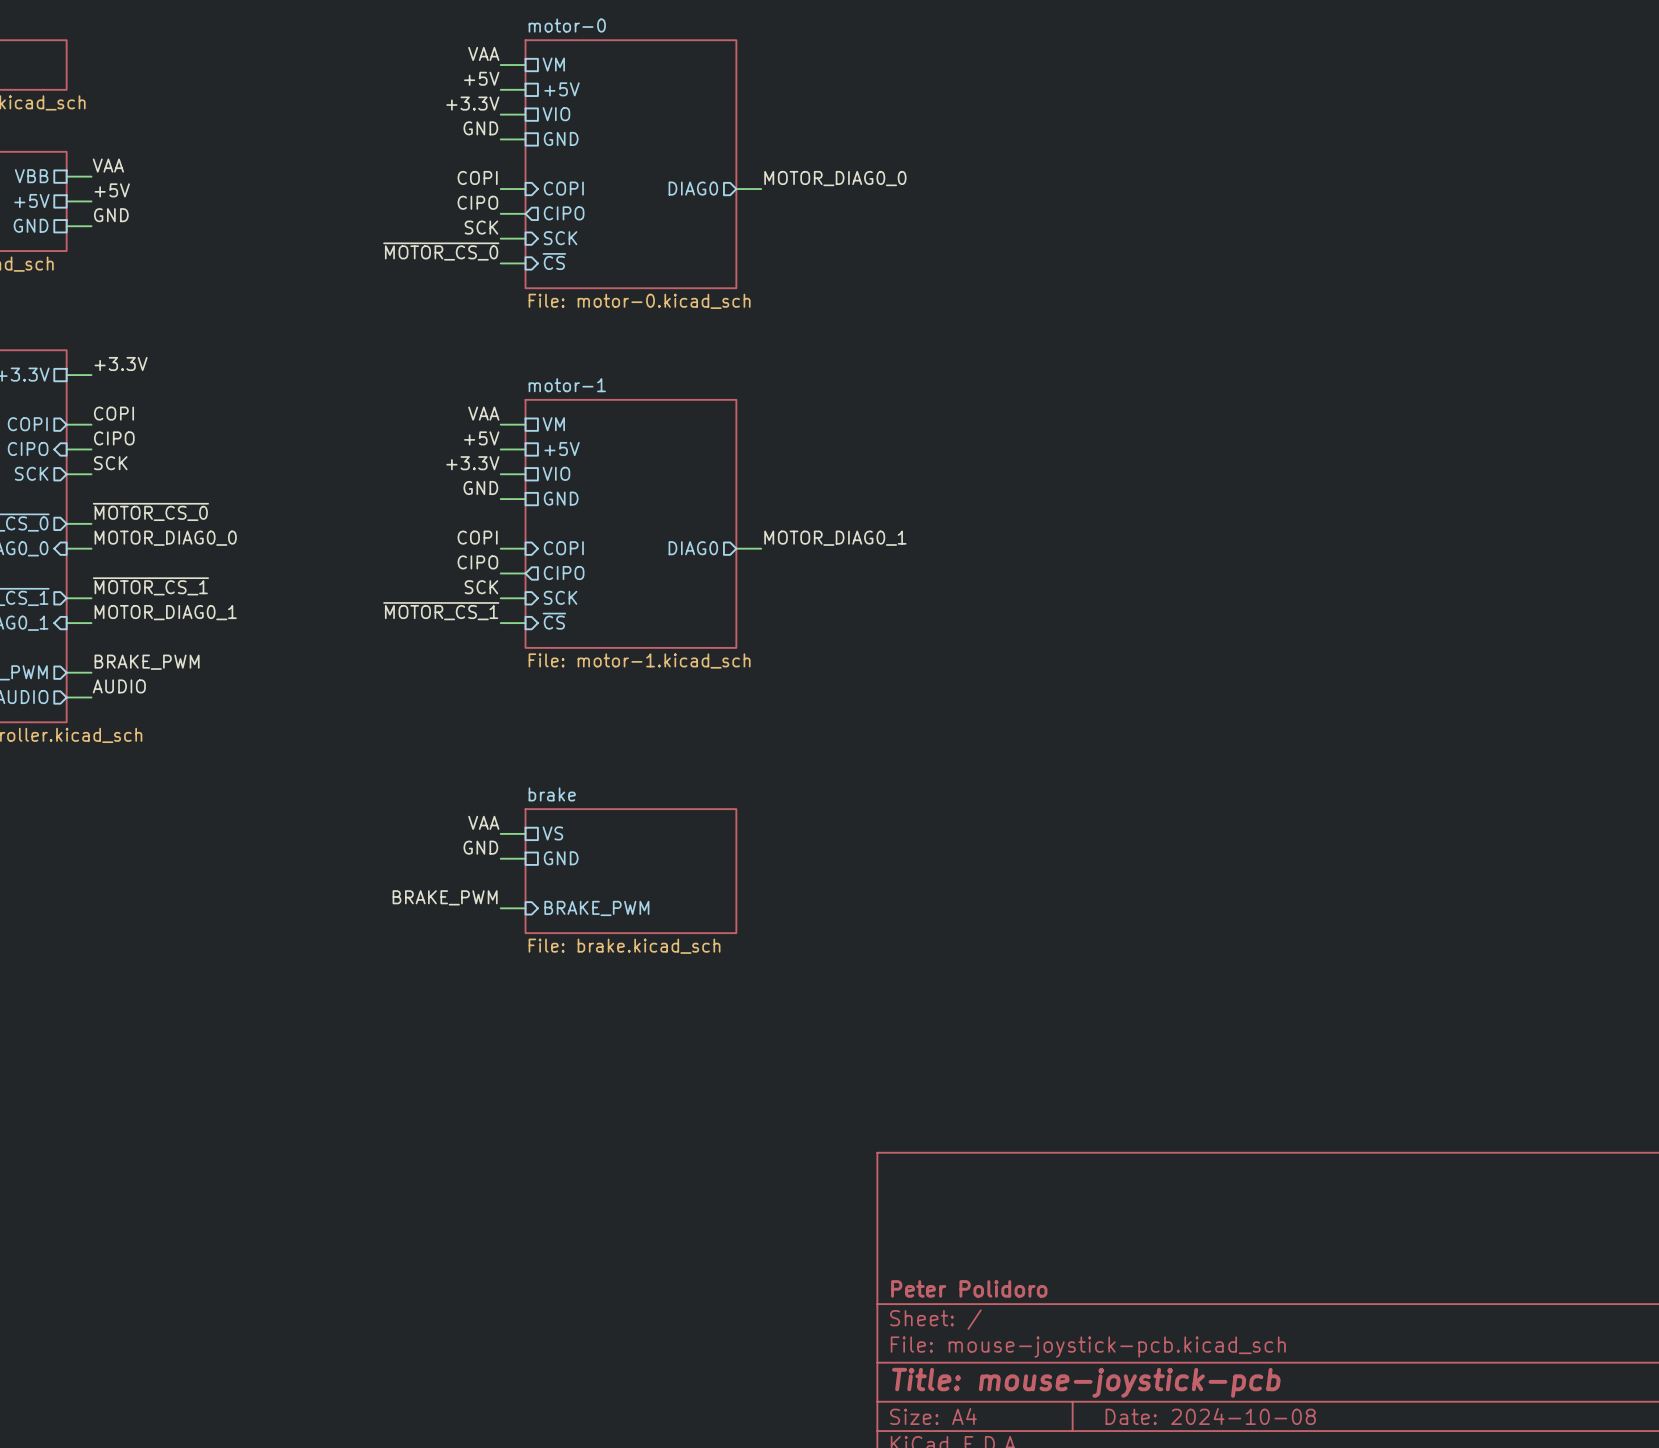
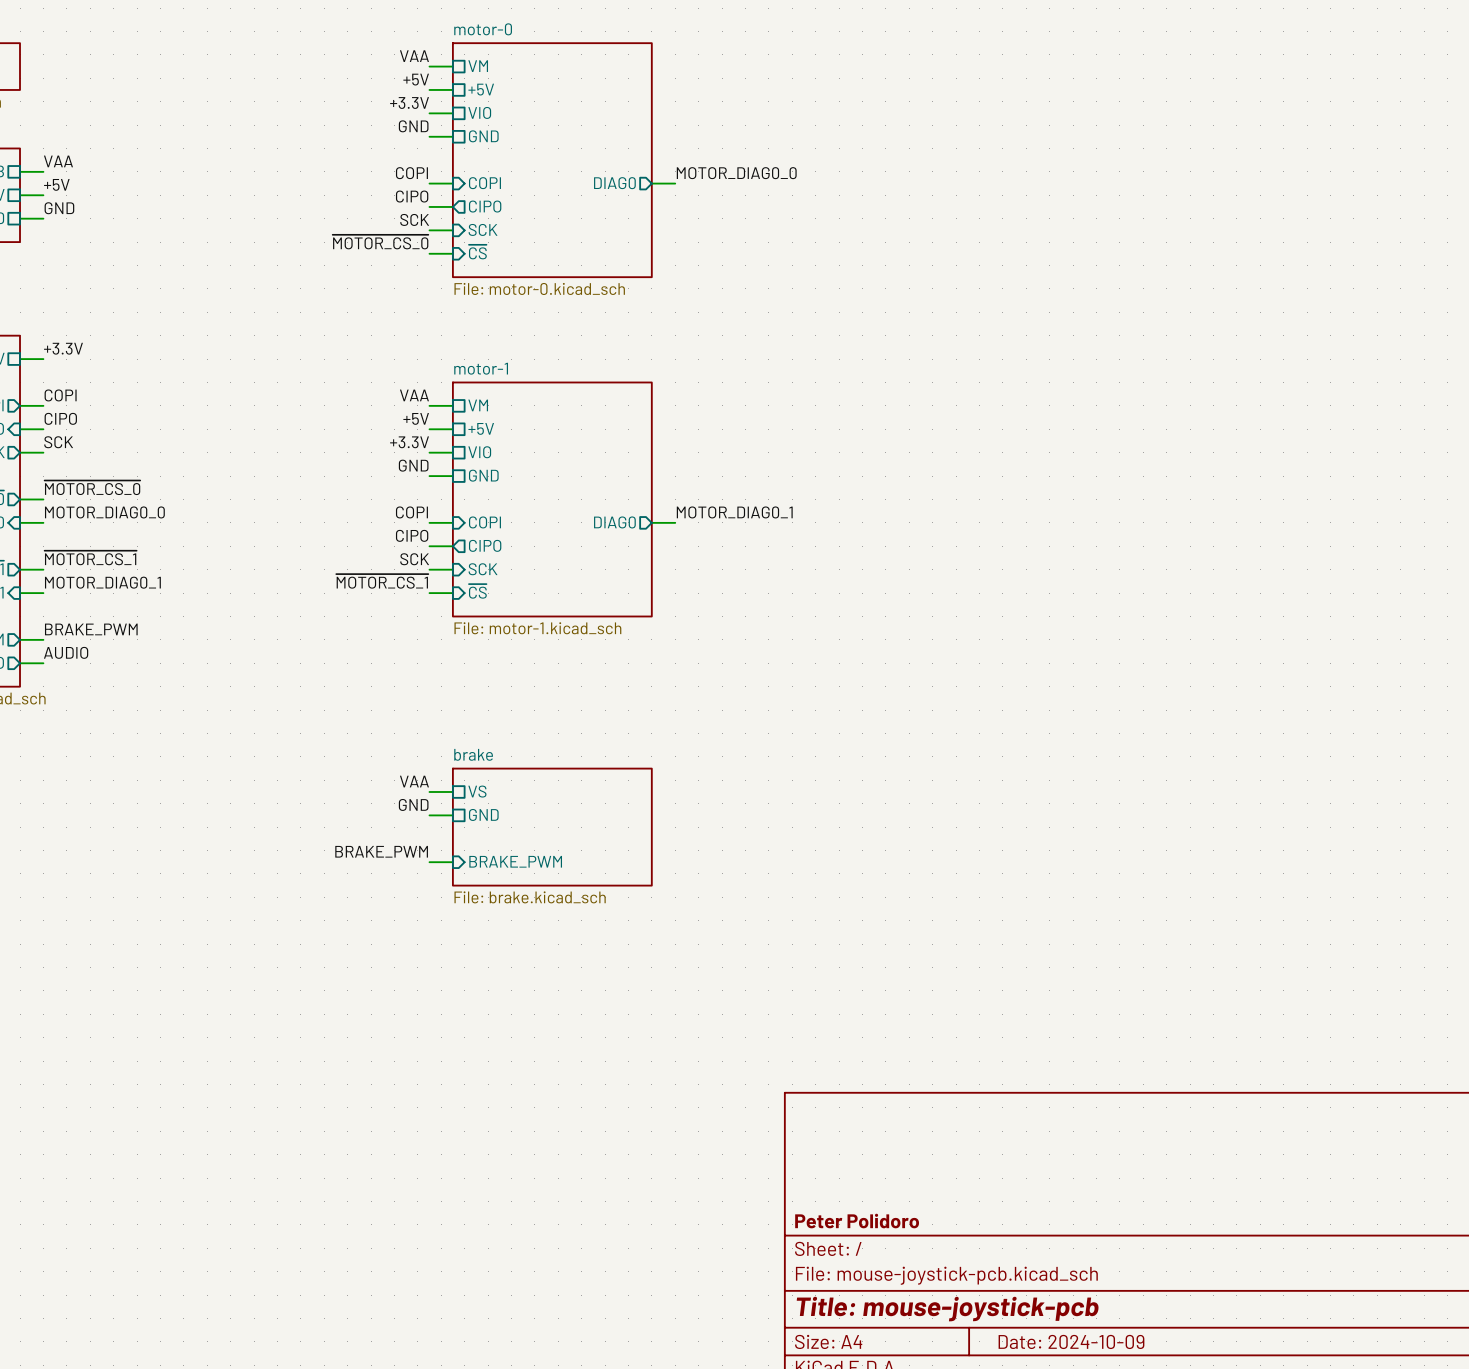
title block: Date: 2024-10-08 (1210, 1416) -> Date: 2024-10-09 (1071, 1341)

